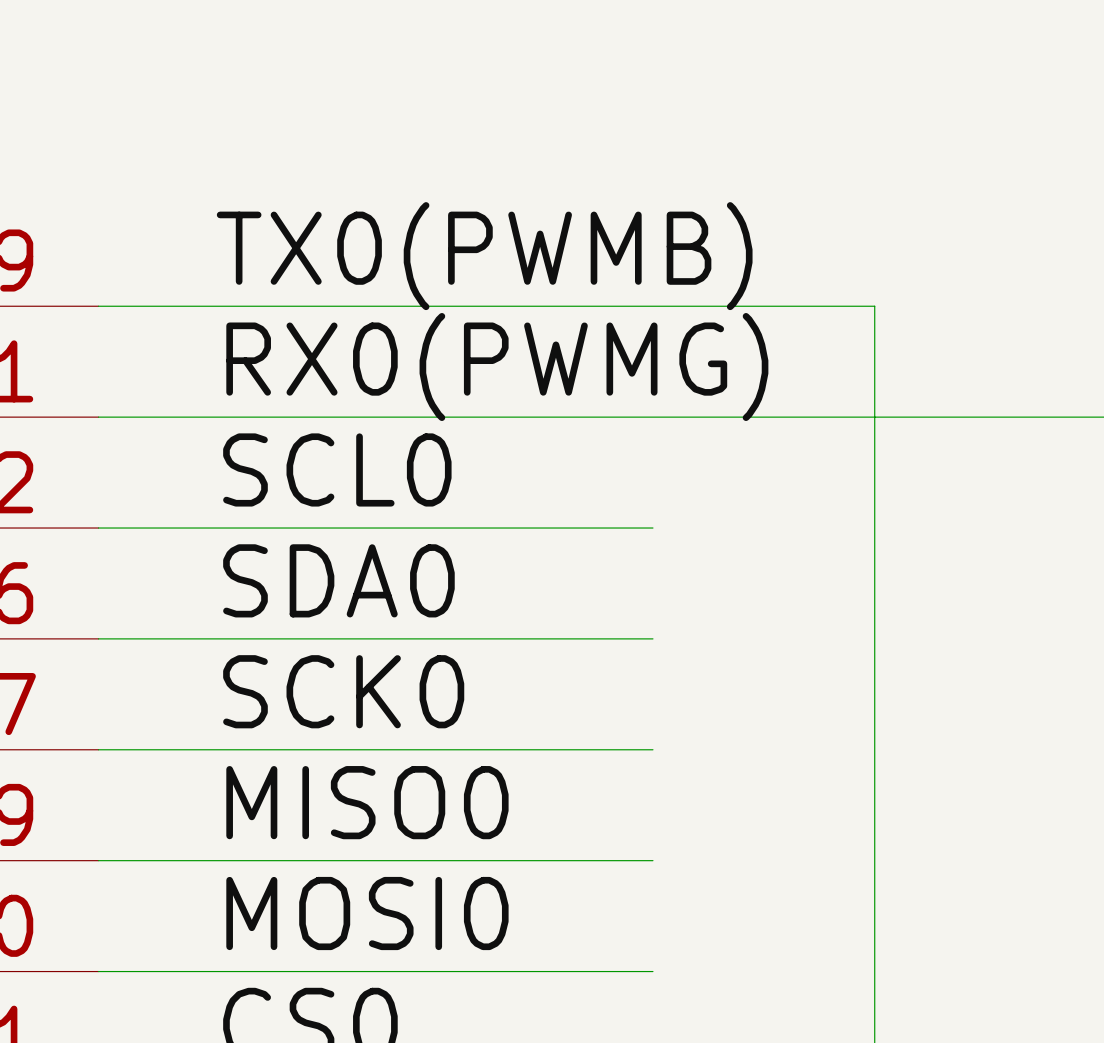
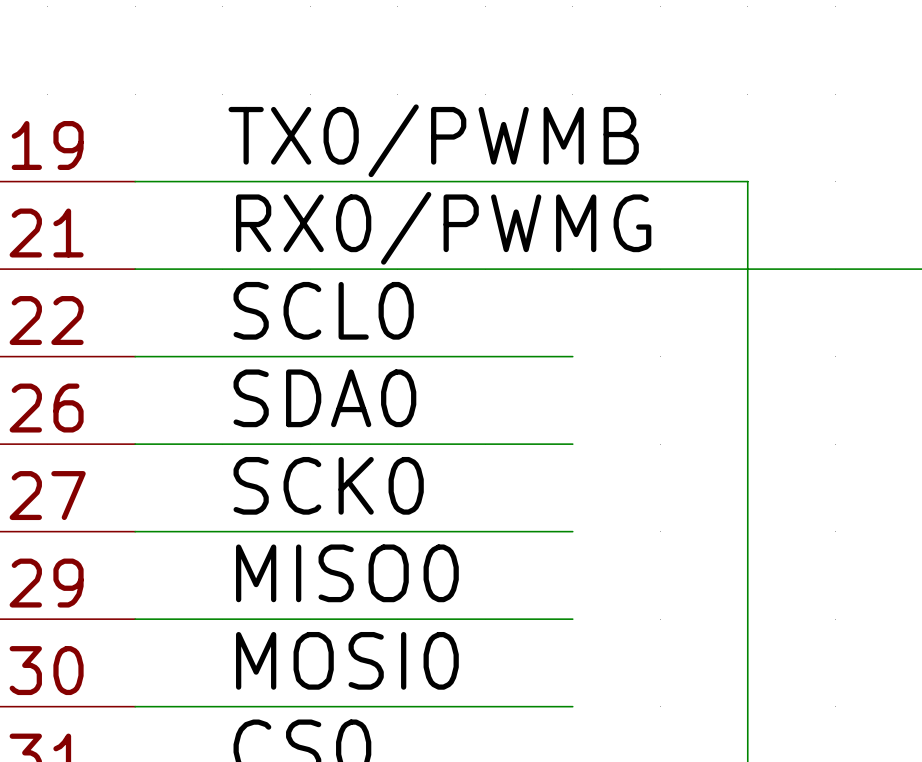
label: TX0(PWMB) (484, 256) -> TX0/PWMB (433, 140)
label: RX0(PWMG) (497, 367) -> RX0/PWMG (443, 228)

